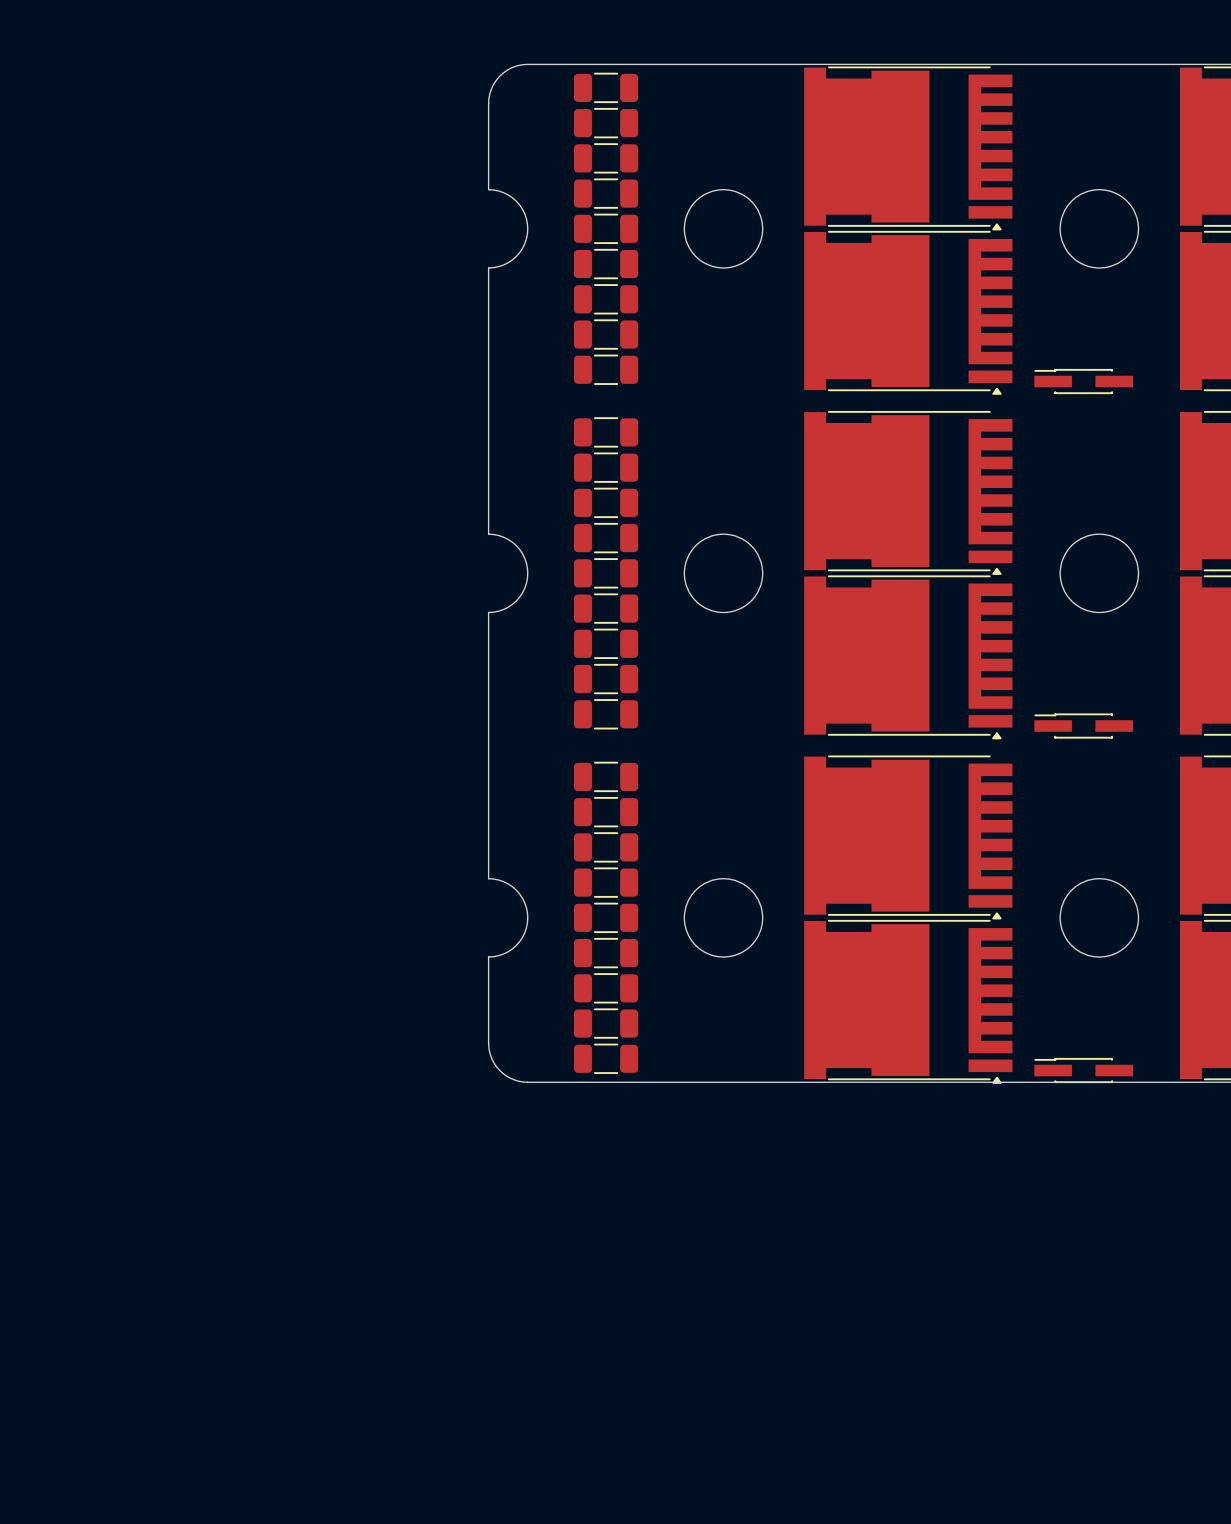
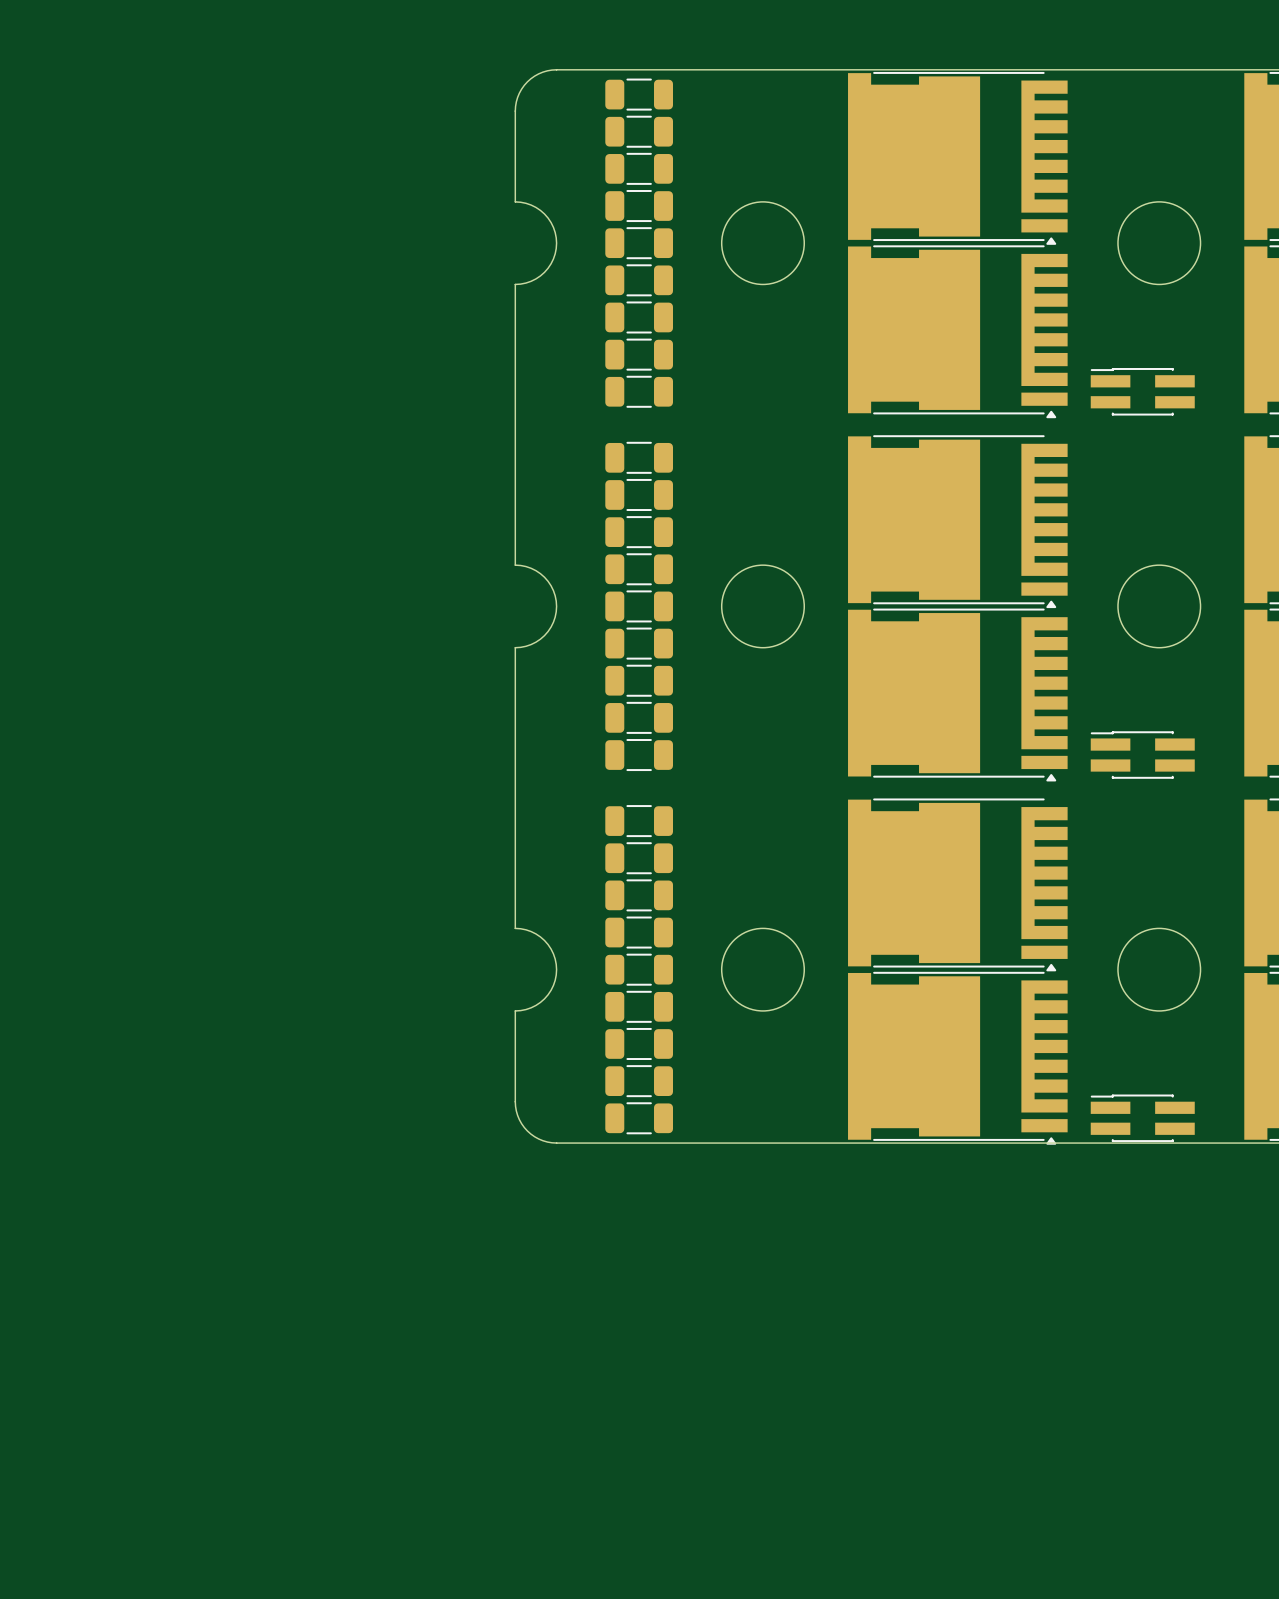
part footprint: [1034, 368, 1134, 395] -> [1090, 368, 1195, 416]
part footprint: [1034, 713, 1134, 739] -> [1090, 731, 1195, 779]
part footprint: [1034, 1057, 1134, 1084] -> [1090, 1094, 1195, 1143]

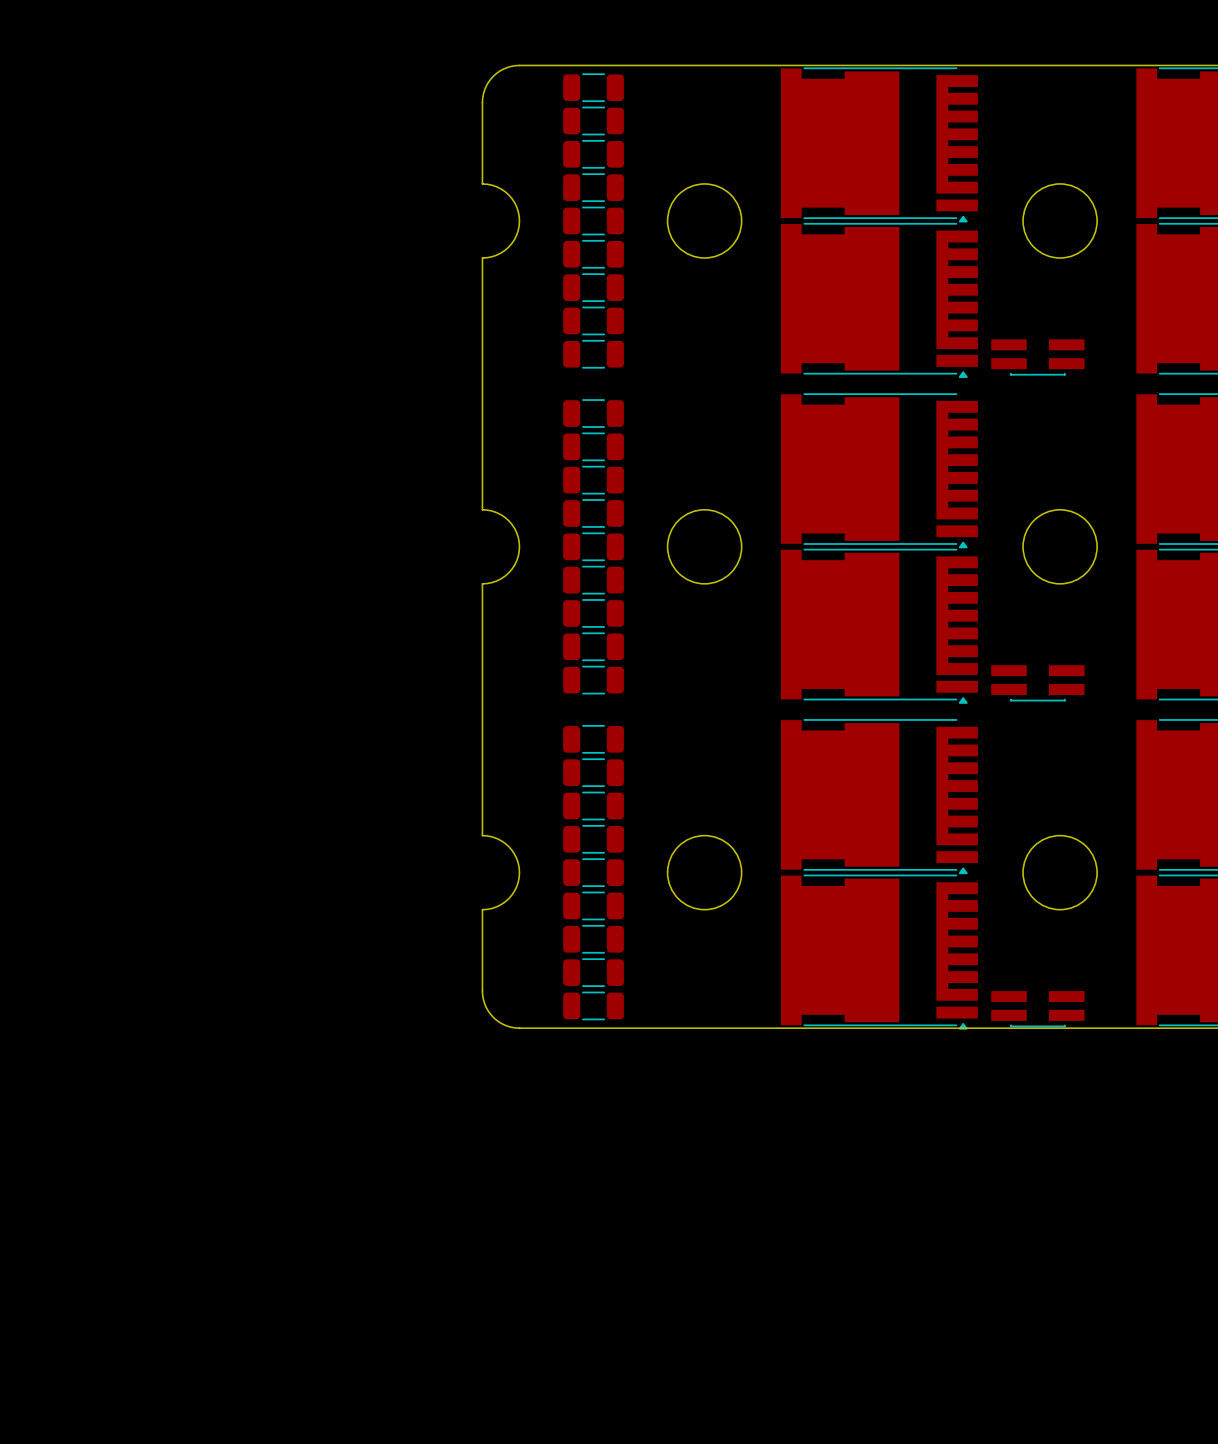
part footprint: [1090, 368, 1195, 416] -> [991, 339, 1085, 376]
part footprint: [1090, 731, 1195, 779] -> [991, 665, 1085, 702]
part footprint: [1090, 1094, 1195, 1143] -> [991, 991, 1085, 1028]

